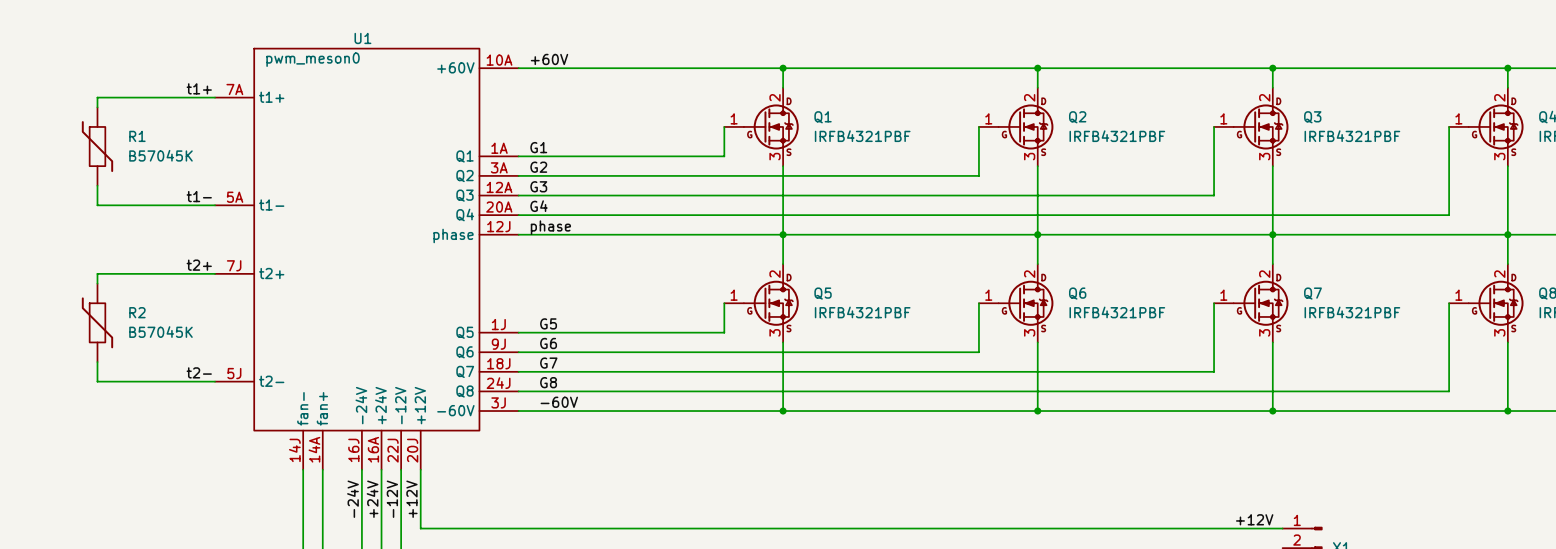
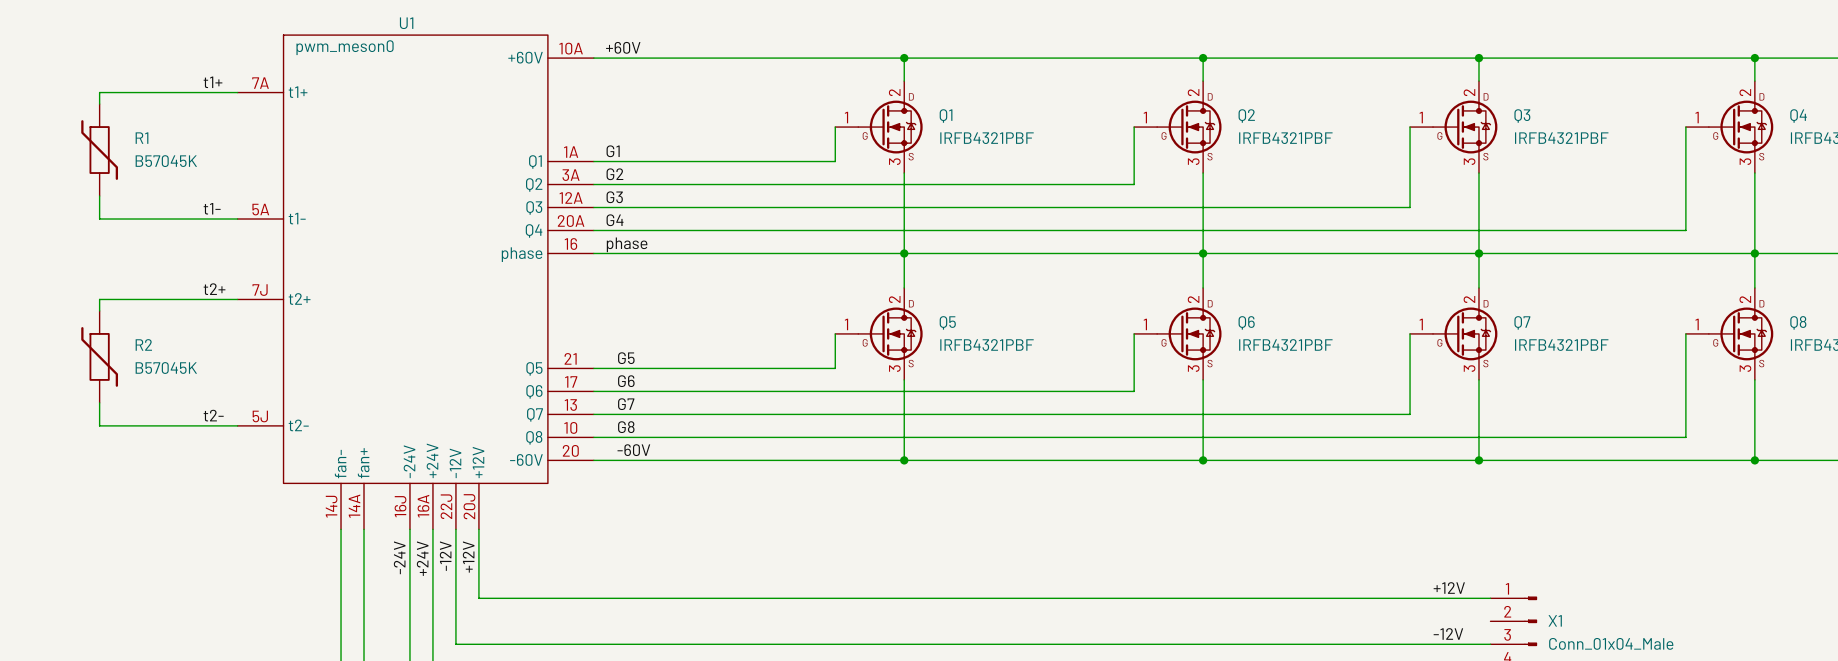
U1 pin number: 12J (498, 226) -> 16 (570, 243)
U1 pin number: 1J (498, 324) -> 21 (570, 358)
U1 pin number: 9J (498, 344) -> 17 (571, 381)
U1 pin number: 18J (498, 363) -> 13 (570, 404)
U1 pin number: 24J (498, 383) -> 10 (570, 427)
U1 pin number: 3J (498, 402) -> 20 (570, 450)

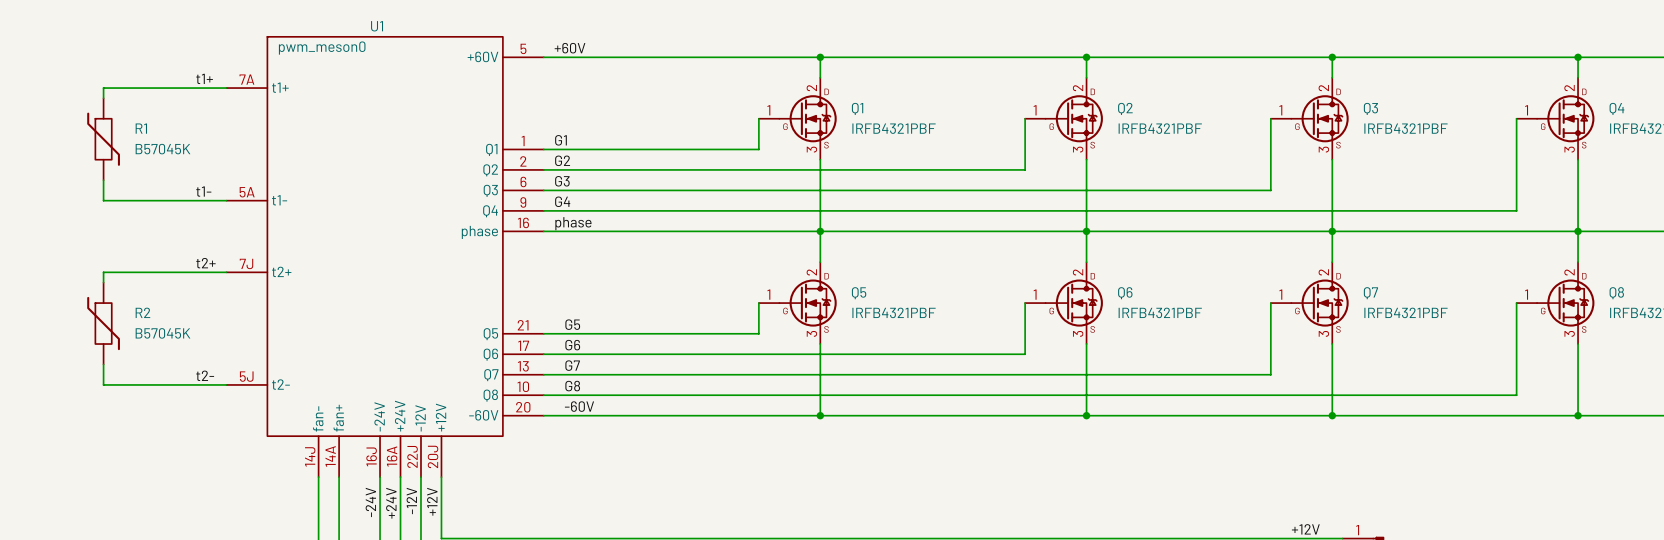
U1 pin number: 10A (571, 48) -> 5 (523, 48)
U1 pin number: 1A (571, 152) -> 1 (523, 141)
U1 pin number: 3A (571, 175) -> 2 (523, 161)
U1 pin number: 12A (571, 197) -> 6 (523, 181)
U1 pin number: 20A (571, 221) -> 9 (523, 202)

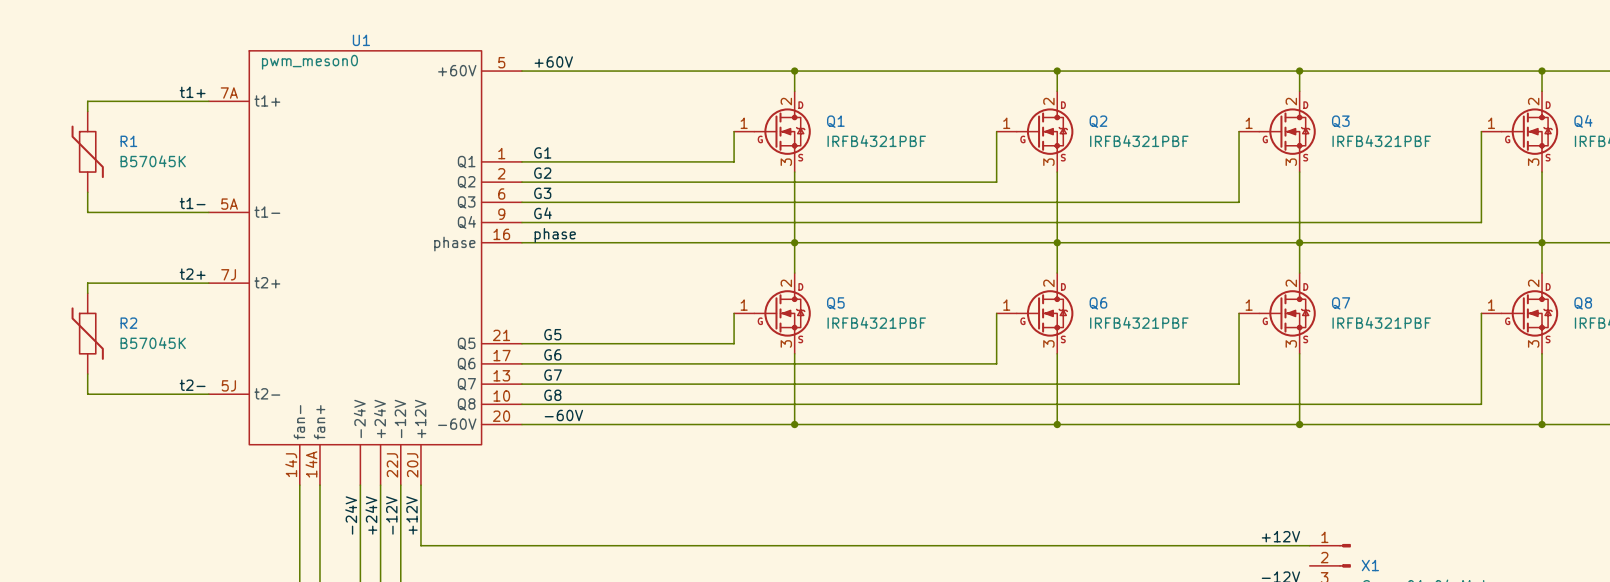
U1 pin number: 16J (371, 456) -> none
U1 pin number: 16A (392, 456) -> none

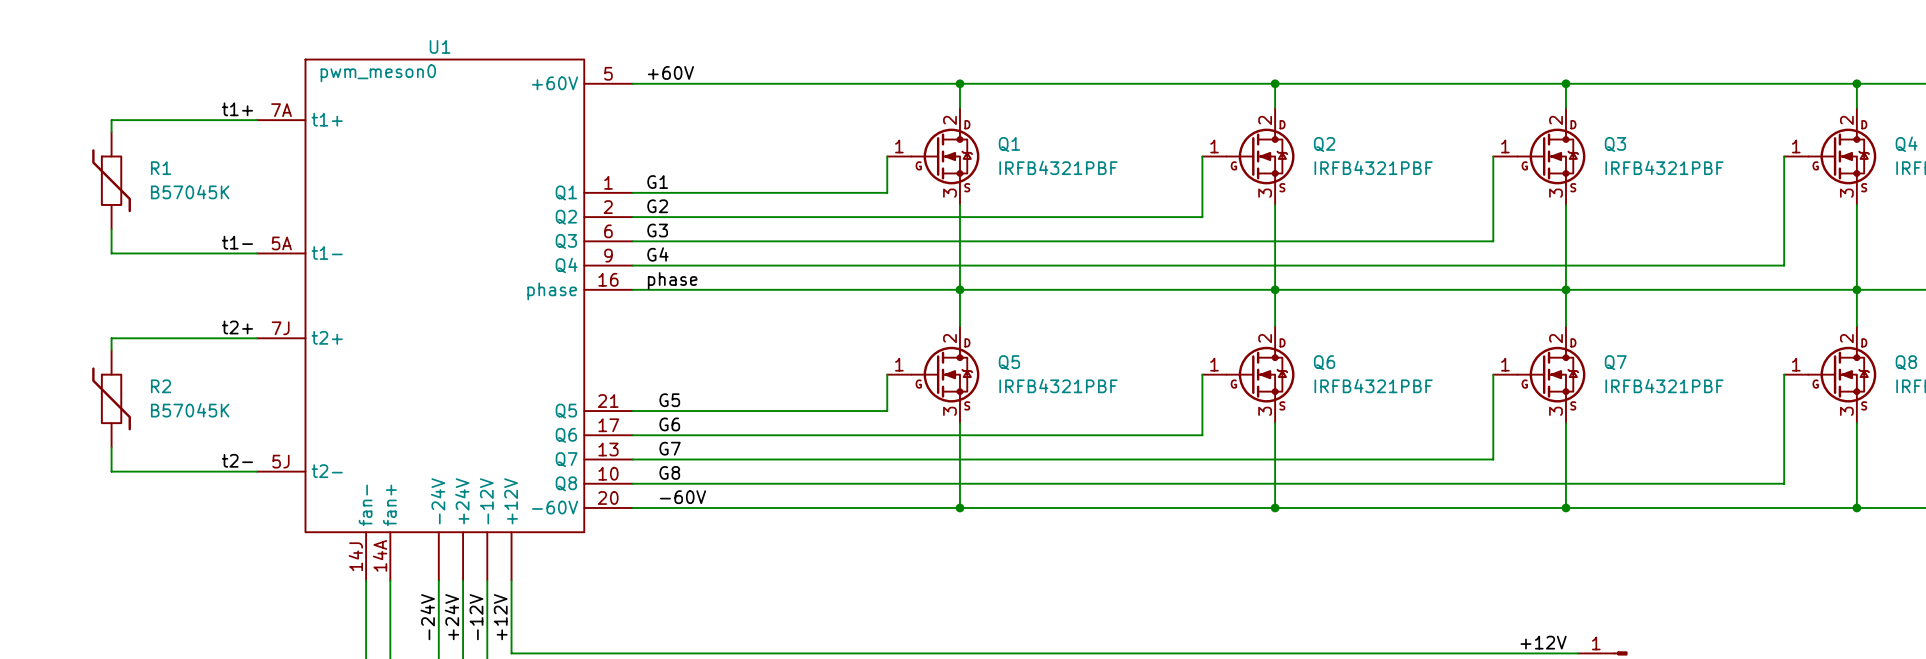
U1 pin number: 22J (392, 465) -> none
U1 pin number: 20J (412, 465) -> none

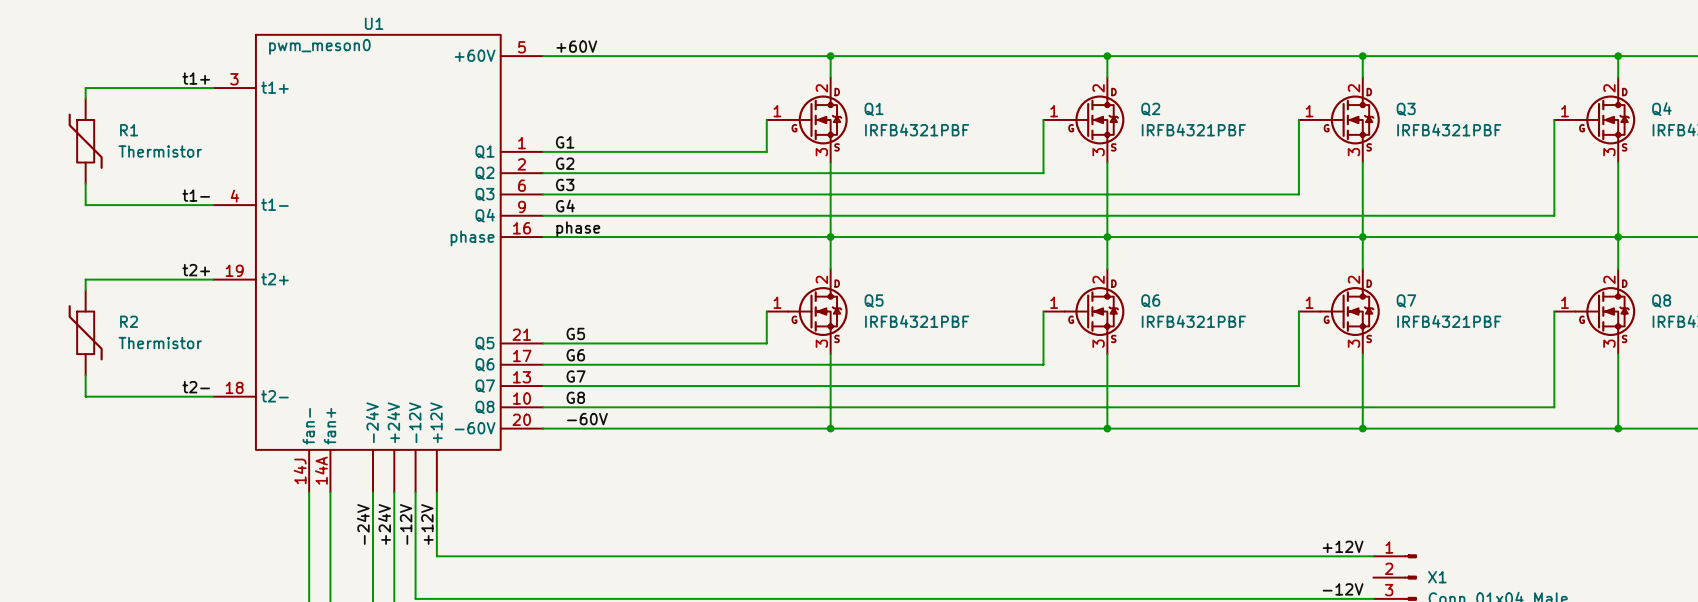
U1 pin number: 7A (281, 110) -> 3 (234, 79)
R1 value: B57045K (190, 192) -> Thermistor (160, 151)
U1 pin number: 5A (281, 243) -> 4 (234, 196)
U1 pin number: 7J (280, 328) -> 19 (234, 270)
R2 value: B57045K (190, 410) -> Thermistor (160, 343)
U1 pin number: 5J (280, 461) -> 18 (234, 387)

